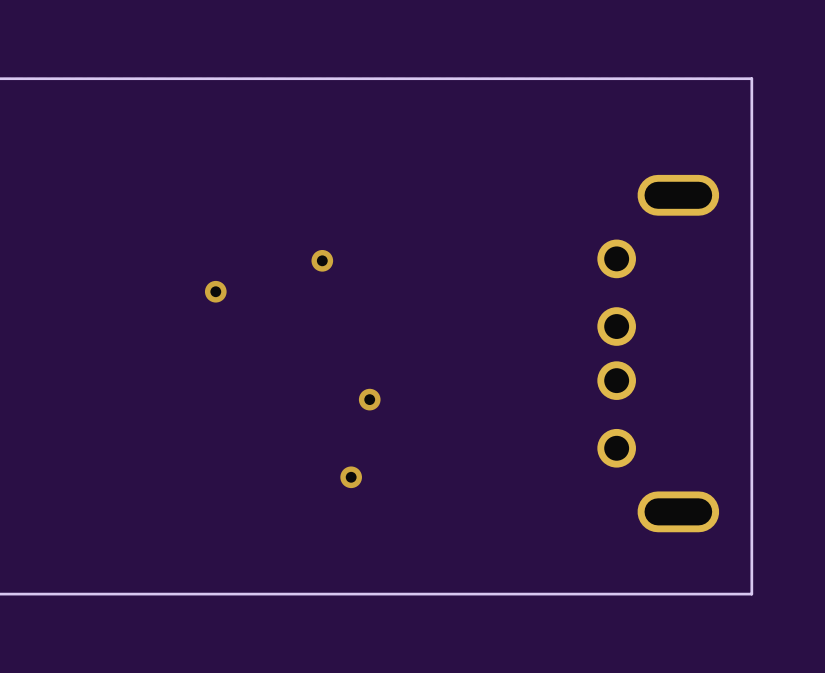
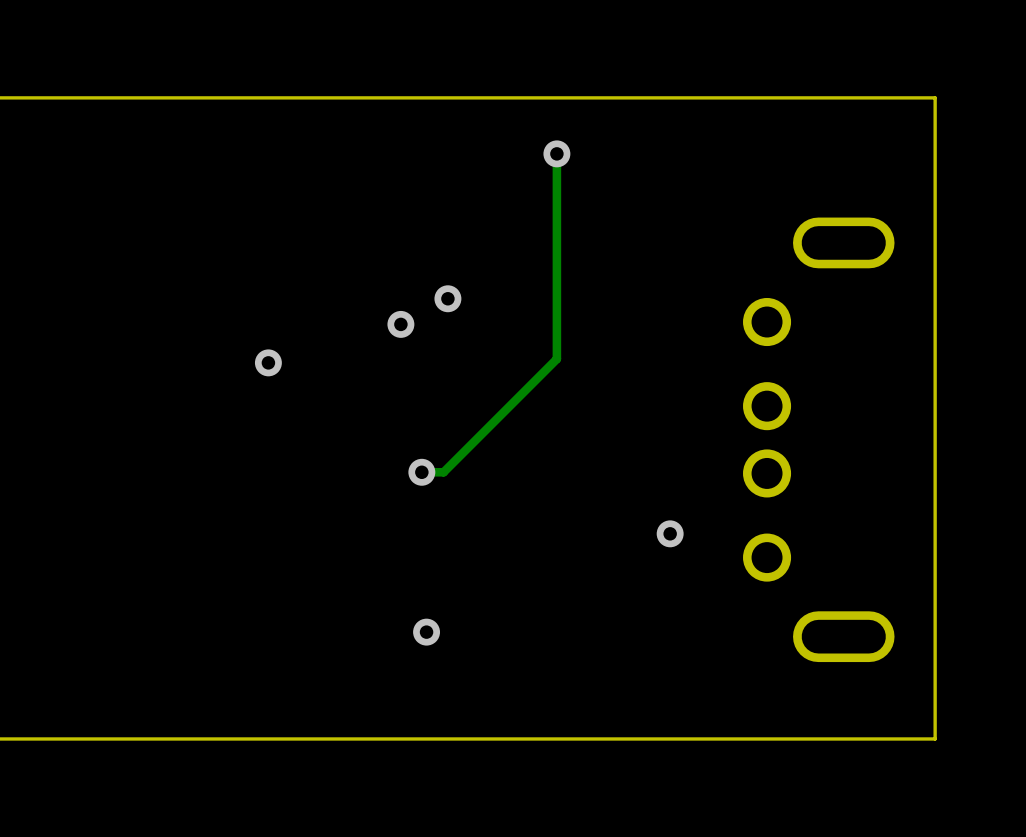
track: none -> (556, 153) (556, 359) (443, 472) (421, 472)
via: none -> (556, 153)
via: none -> (447, 298)
via position: (369, 399) -> (421, 472)
via: none -> (670, 533)
via position: (351, 477) -> (426, 632)

